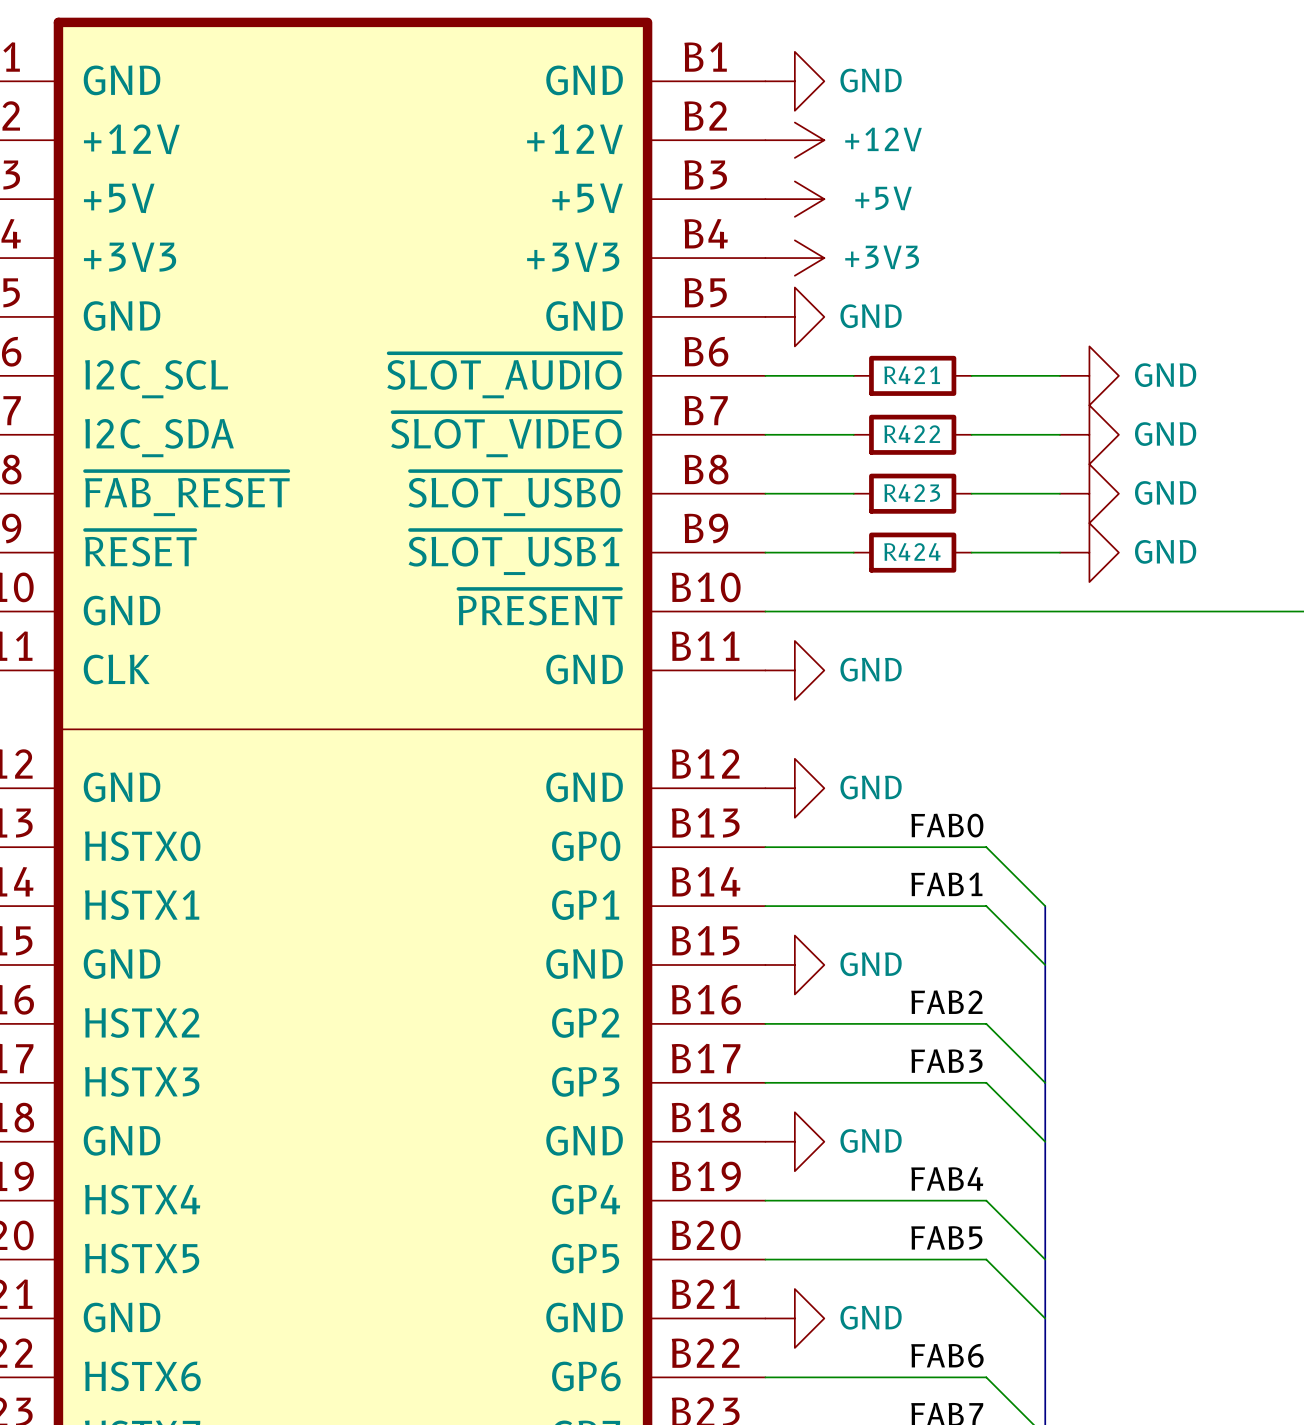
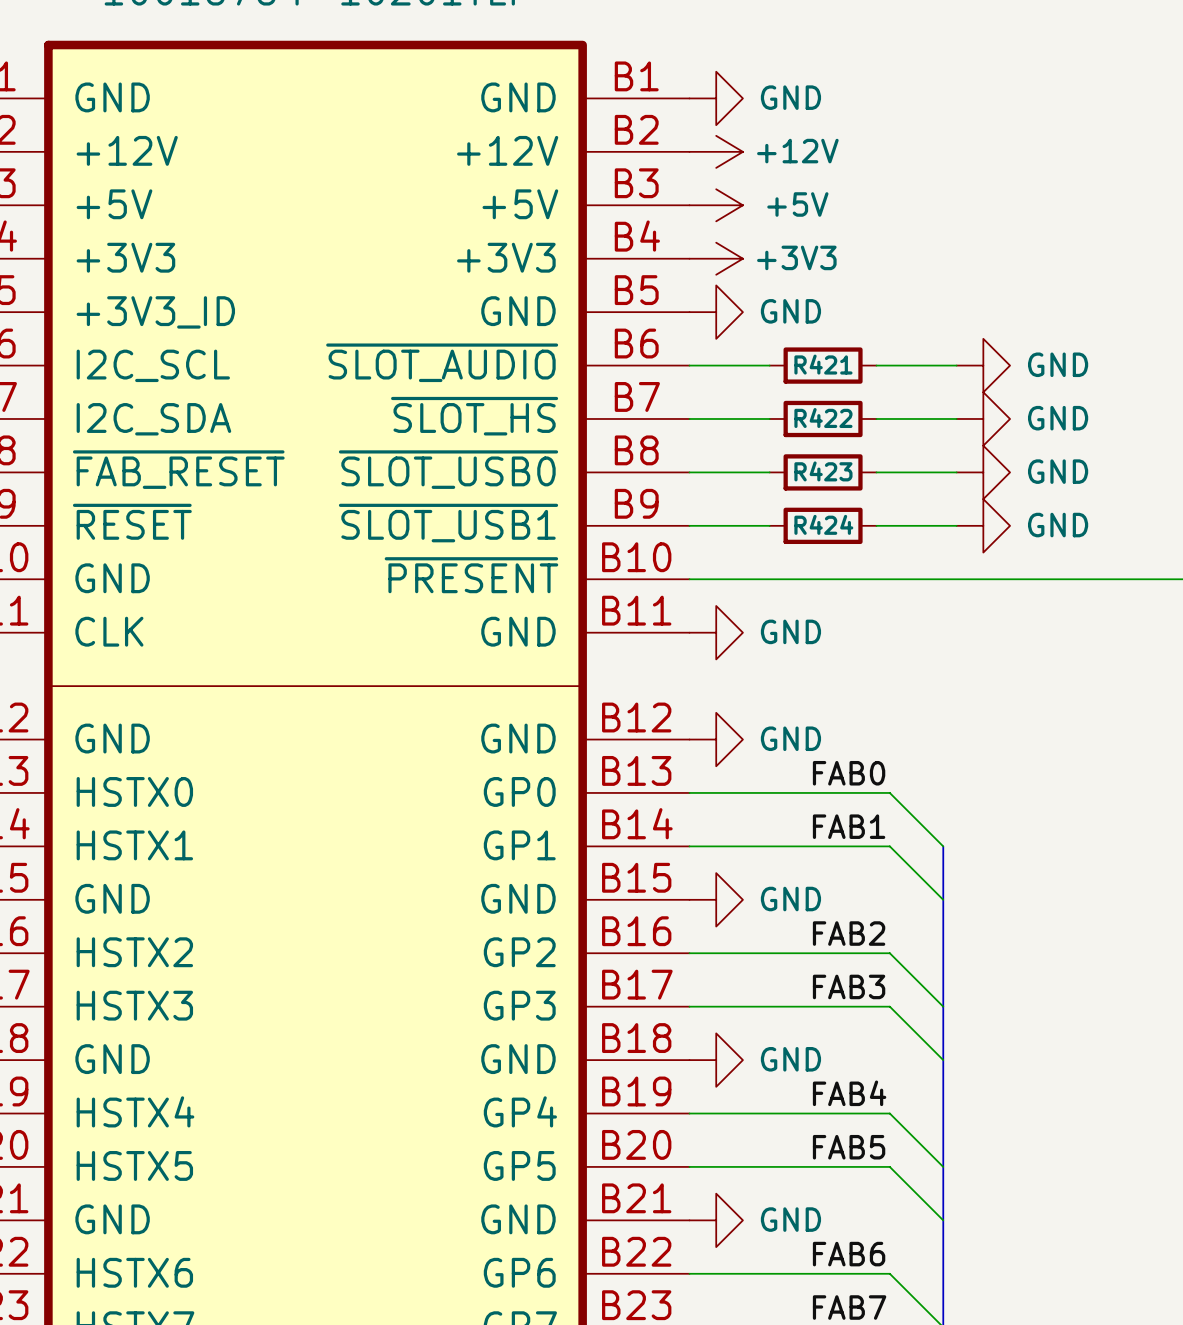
part pin name: GND (122, 316) -> +3V3_ID (155, 312)
part pin name: ~{SLOT_VIDEO} (506, 434) -> ~{SLOT_HS} (474, 416)

